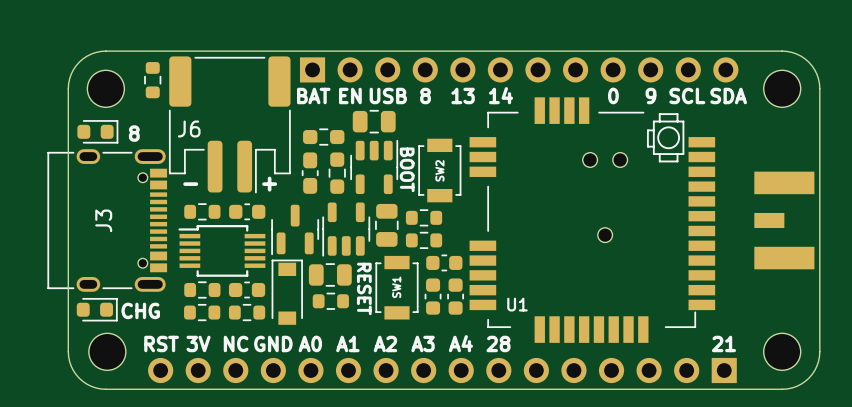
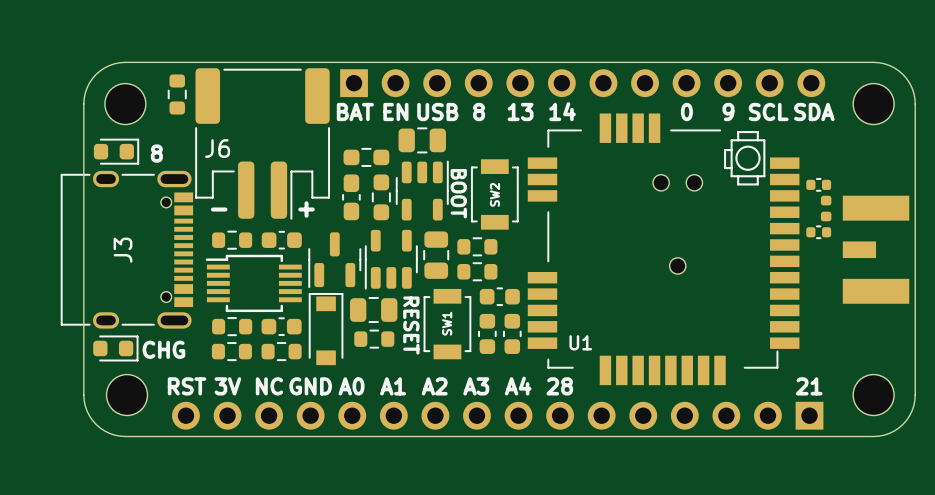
part: none -> (818, 184)
part: none -> (826, 208)
part: none -> (818, 232)

